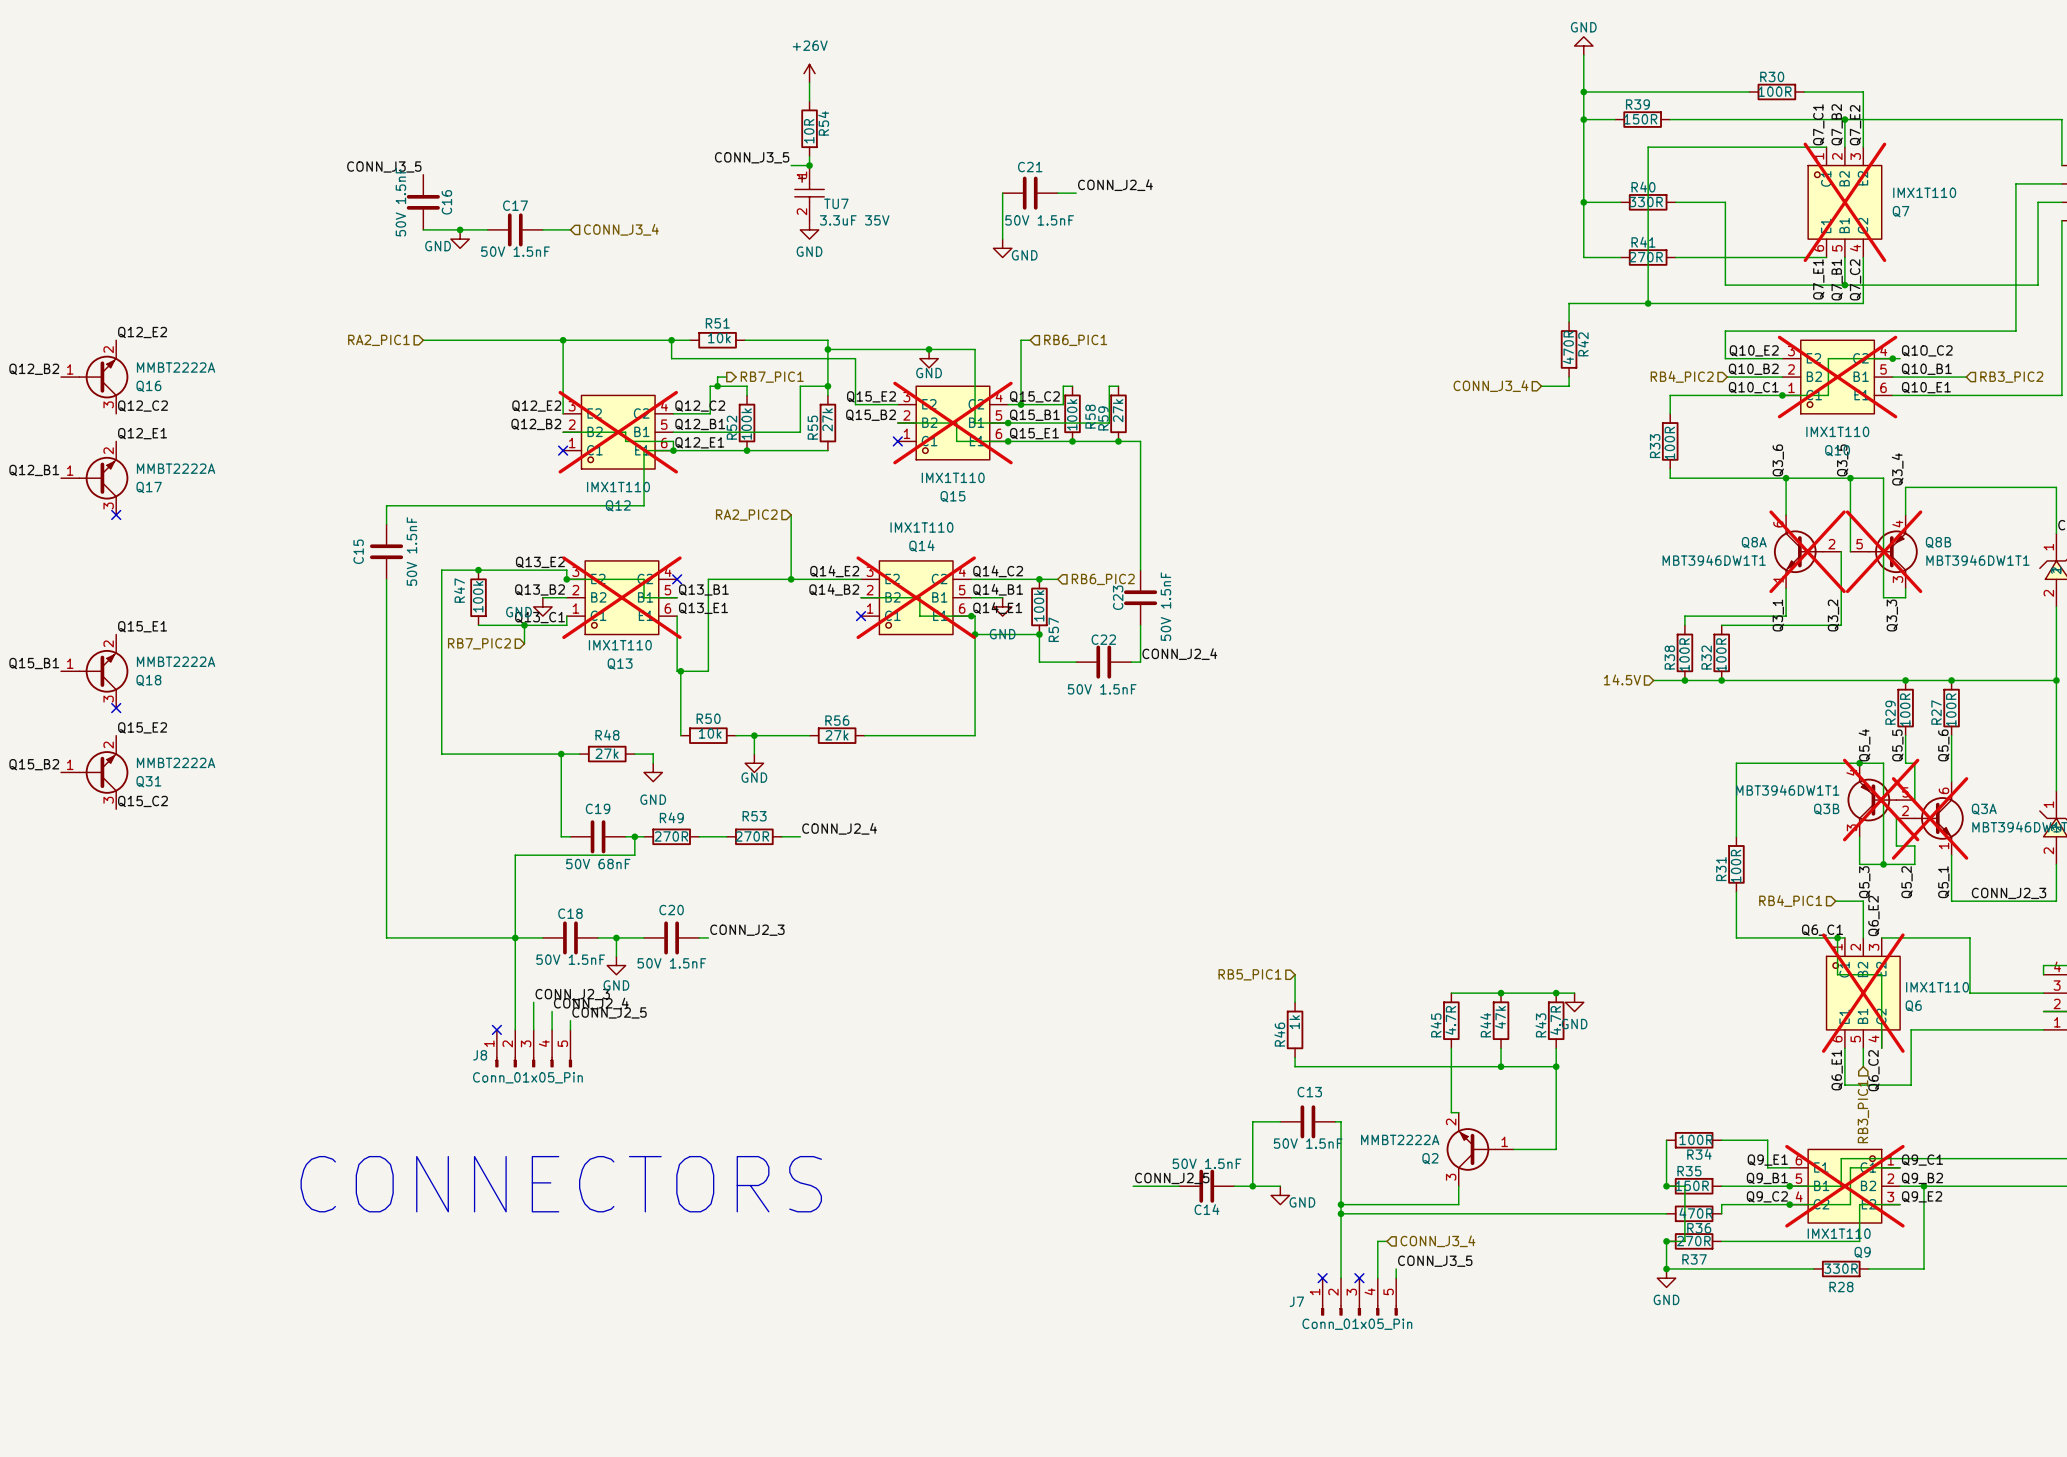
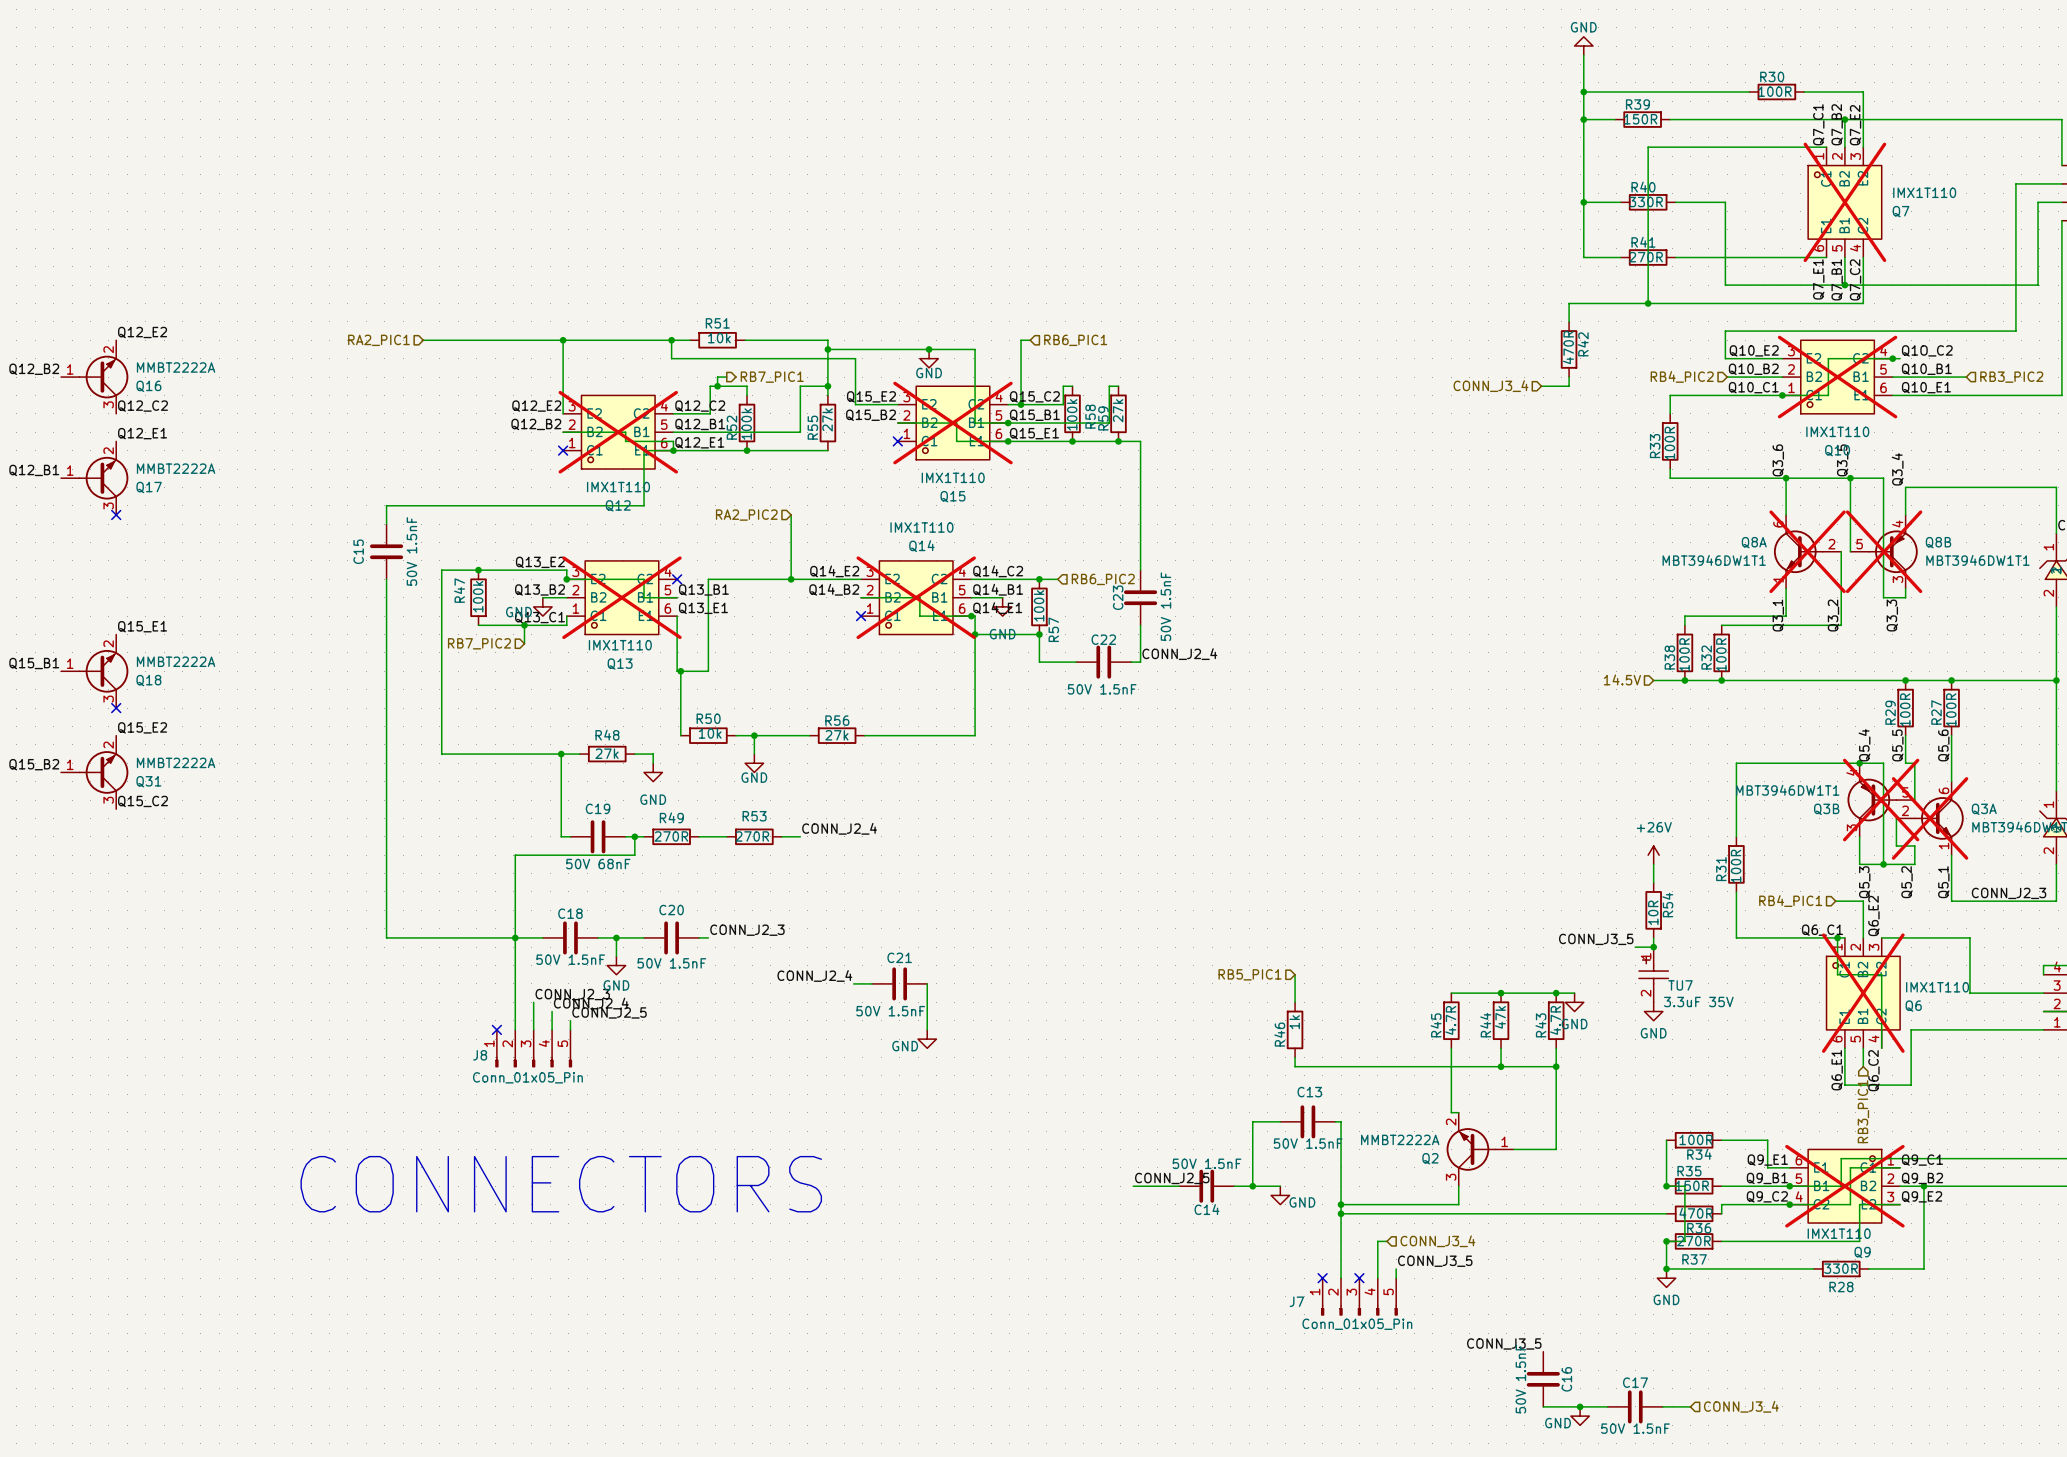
power symbol: +26V (809, 73) -> none
wire: (809, 82) (809, 101) -> none
R54 position: (809, 128) -> (1653, 910)
wire: (809, 156) (809, 165) (791, 165) -> none
label: CONN_J3_5 (752, 157) -> none
junction: (809, 165) -> none
label: CONN_J3_5 (384, 166) -> none
label: CONN_J2_4 (1115, 185) -> none
TU7 position: (809, 193) -> (1653, 974)
wire: (1002, 193) (1002, 239) -> none
C21 position: (1030, 193) -> (899, 983)
wire: (1057, 193) (1076, 193) -> none
C16 position: (423, 202) -> (1543, 1379)
C21 value position: 50V 1.5nF (1039, 220) -> 50V 1.5nF (890, 1011)
wire: (423, 229) (487, 229) -> none
junction: (460, 229) -> none
C17 position: (515, 229) -> (1635, 1406)
wire: (542, 229) (570, 229) -> none
hierarchical label: CONN_J3_4 (621, 229) -> none
power symbol: GND (809, 229) -> none
power symbol: GND (460, 239) -> none
power symbol: GND (1002, 248) -> none
power symbol: none -> +26V (1653, 855)
wire: none -> (1653, 864) (1653, 882)
wire: none -> (1653, 937) (1653, 947) (1635, 947)
label: none -> CONN_J3_5 (1596, 939)
junction: none -> (1653, 947)
label: none -> CONN_J2_4 (814, 975)
wire: none -> (853, 983) (872, 983)
wire: none -> (927, 983) (927, 1029)
power symbol: none -> GND (1653, 1011)
power symbol: none -> GND (927, 1039)
label: none -> CONN_J3_5 (1504, 1343)
wire: none -> (1543, 1406) (1607, 1406)
junction: none -> (1580, 1406)
wire: none -> (1662, 1406) (1690, 1406)
hierarchical label: none -> CONN_J3_4 (1741, 1406)
power symbol: none -> GND (1580, 1416)

